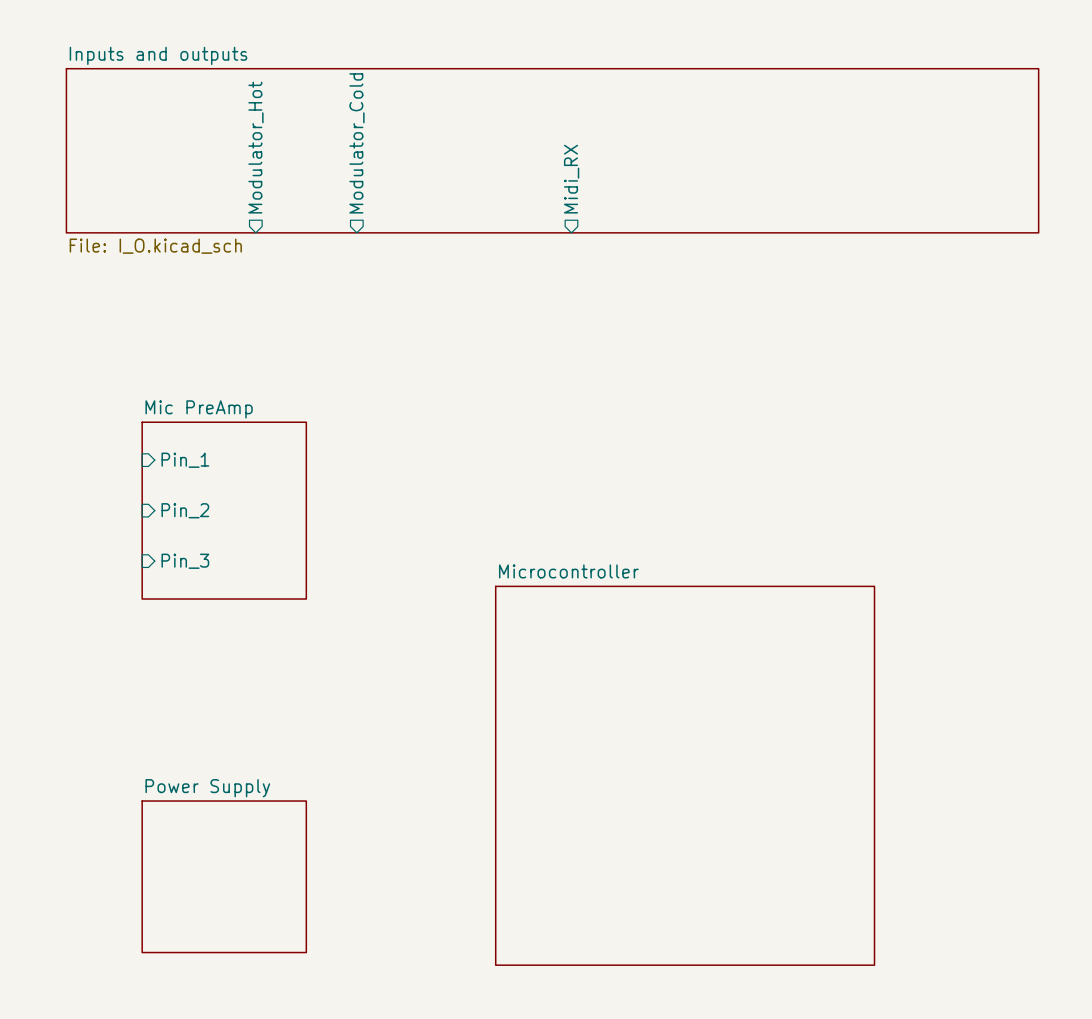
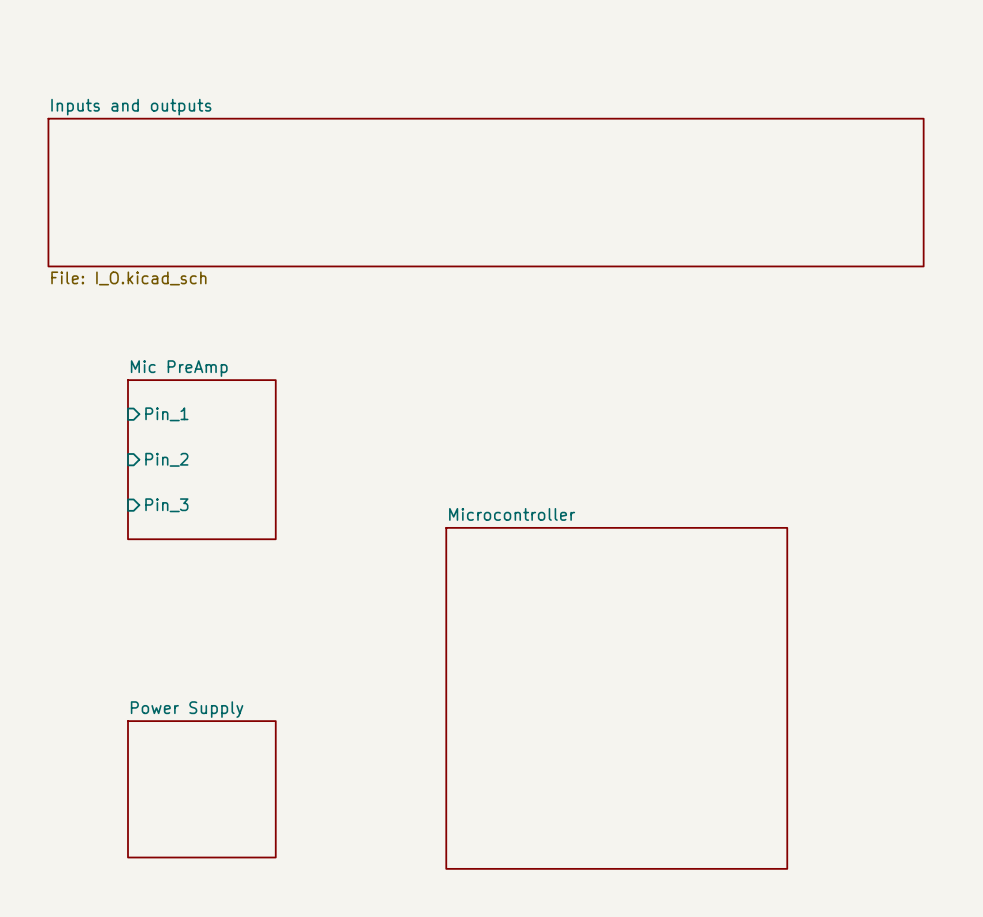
sheet pin: Modulator_Cold (356, 143) -> none
sheet pin: Modulator_Hot (255, 147) -> none
sheet Inputs and outputs position: (552, 150) -> (486, 192)
sheet pin: Midi_RX (571, 179) -> none

